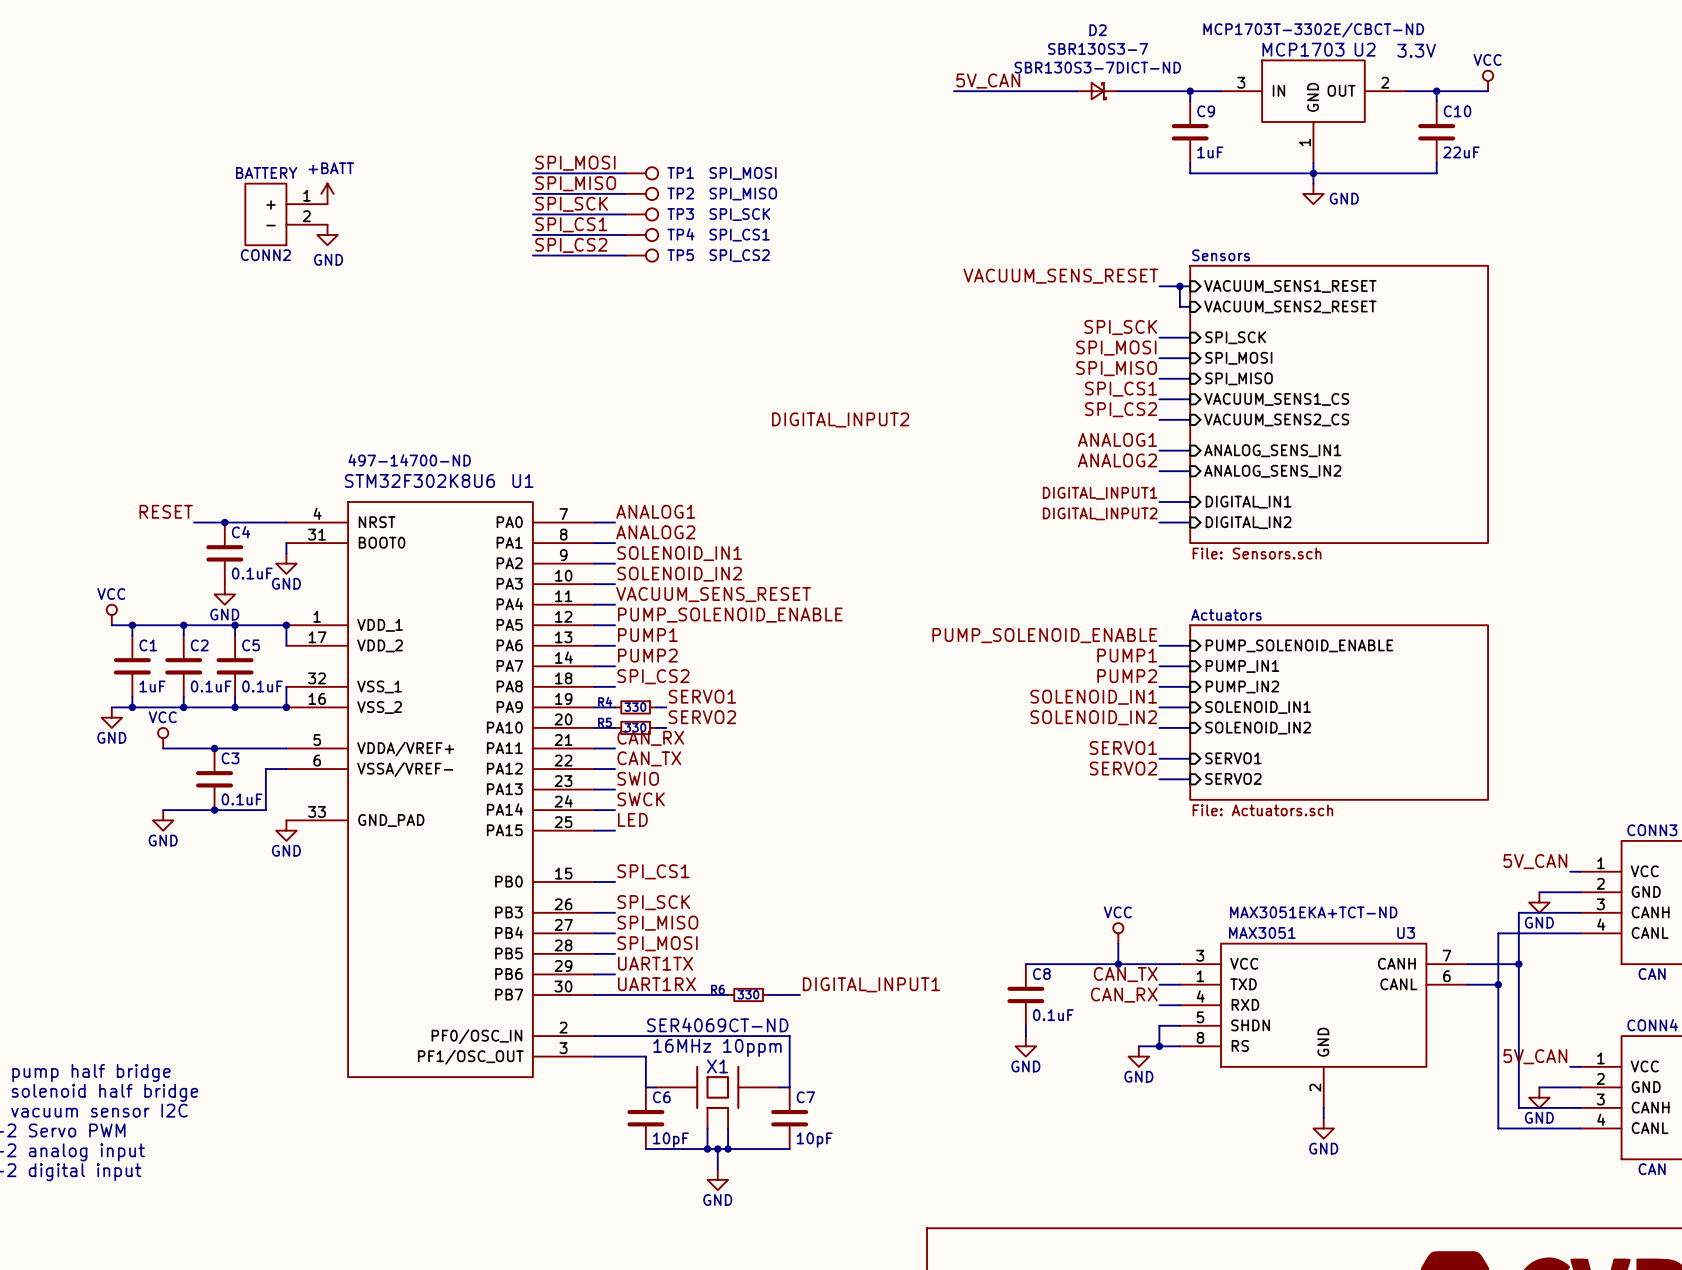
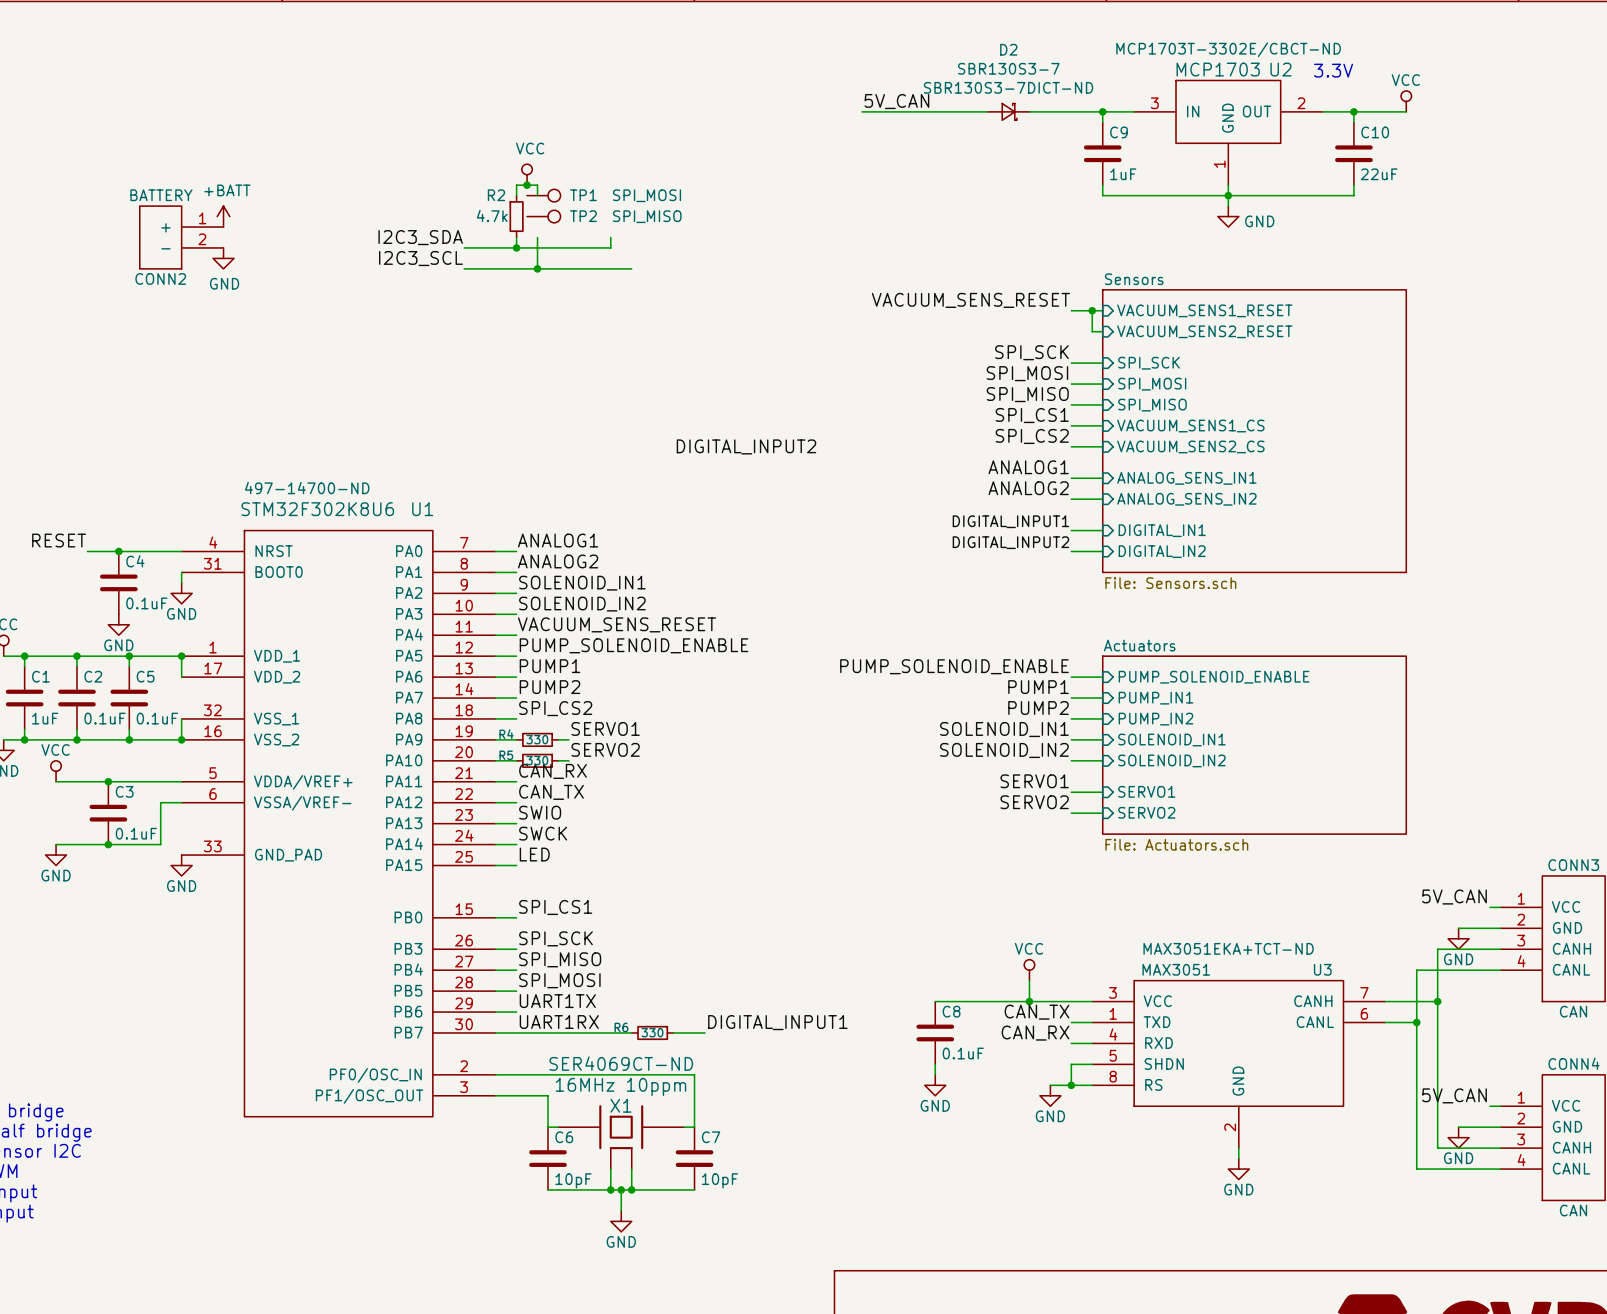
power symbol: none -> VCC (527, 174)
label: SPI_MOSI (575, 163) -> none
junction: none -> (527, 185)
wire: (532, 173) (625, 173) -> none
wire: none -> (516, 195) (516, 185) (537, 185) (537, 195)
label: SPI_MISO (575, 183) -> none
wire: (532, 193) (625, 193) -> none
R2: none -> 4.7k (516, 216)
label: SPI_SCK (571, 204) -> none
label: none -> I2C3_SDA (420, 237)
wire: (532, 214) (625, 214) -> none
wire: none -> (516, 237) (516, 247)
wire: none -> (537, 237) (537, 268)
TP3: SPI_SCK (641, 214) -> none
wire: none -> (610, 237) (610, 247) (464, 247)
label: SPI_CS1 (571, 224) -> none
junction: none -> (516, 247)
wire: (532, 234) (625, 234) -> none
TP4: SPI_CS1 (641, 234) -> none
label: none -> I2C3_SCL (420, 258)
wire: none -> (464, 268) (631, 268)
label: SPI_CS2 (571, 245) -> none
junction: none -> (537, 268)
wire: (532, 255) (625, 255) -> none
TP5: SPI_CS2 (641, 255) -> none

